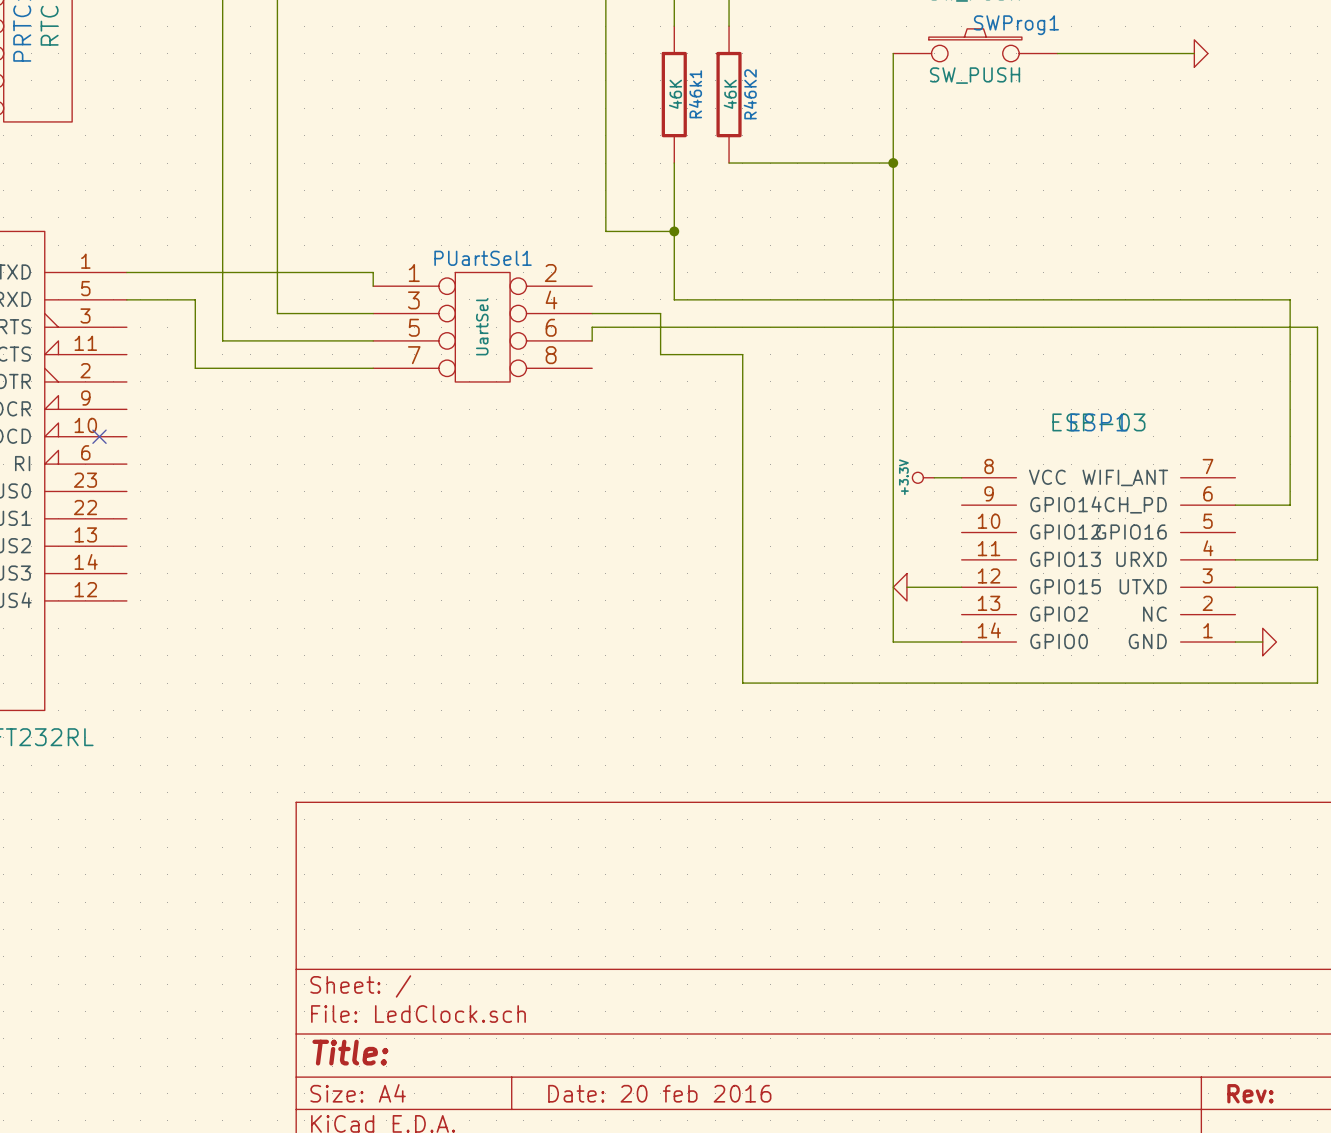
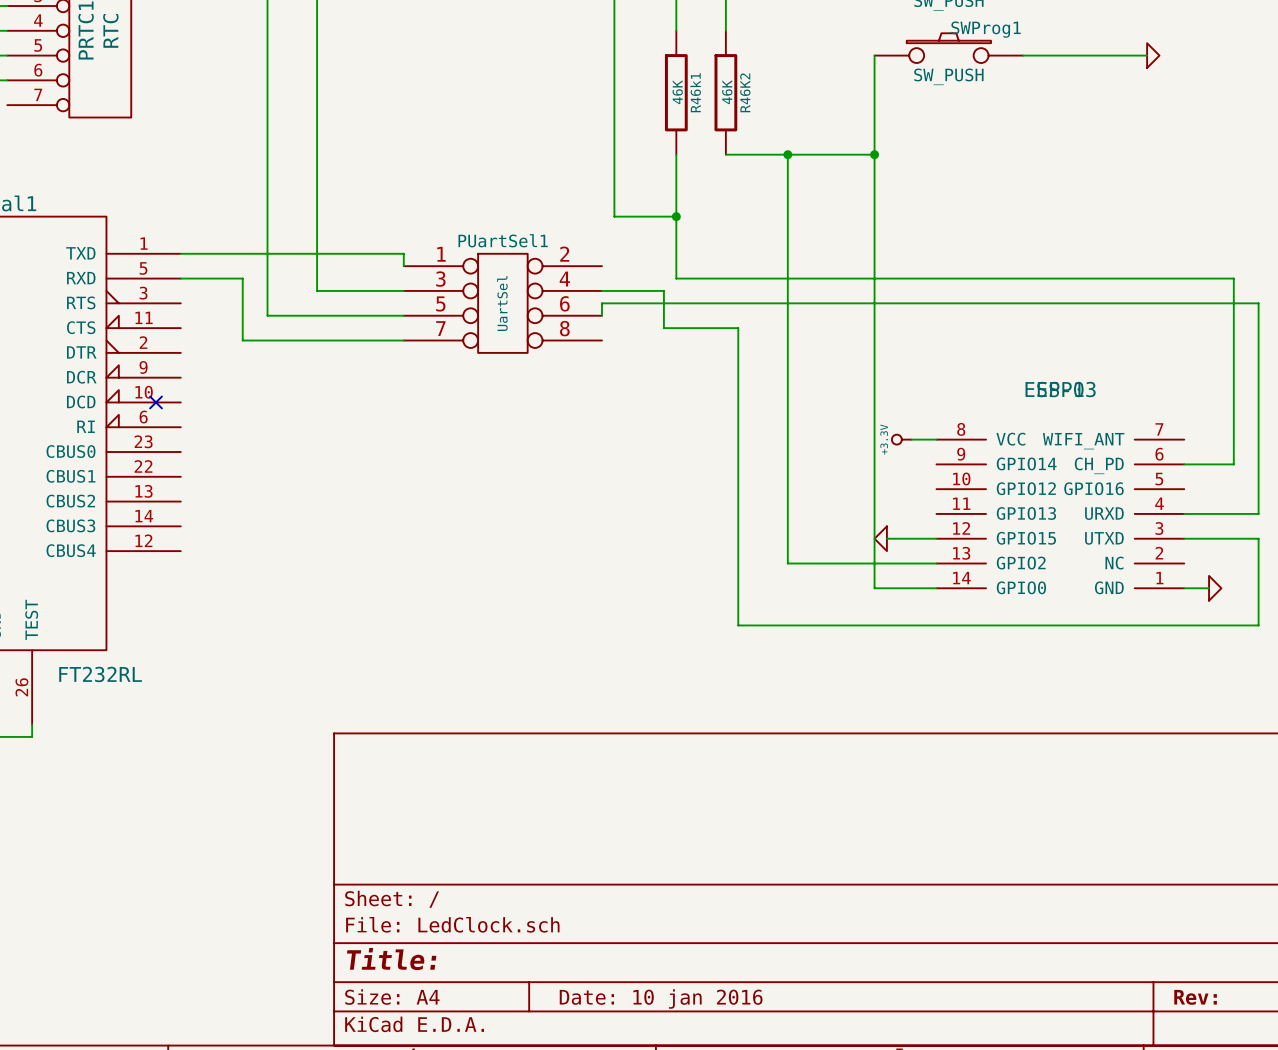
wire: none -> (787, 154) (787, 563) (936, 563)
junction: none -> (787, 154)
title block: Date: 20 feb 2016 (659, 1093) -> Date: 10 jan 2016 (661, 998)

